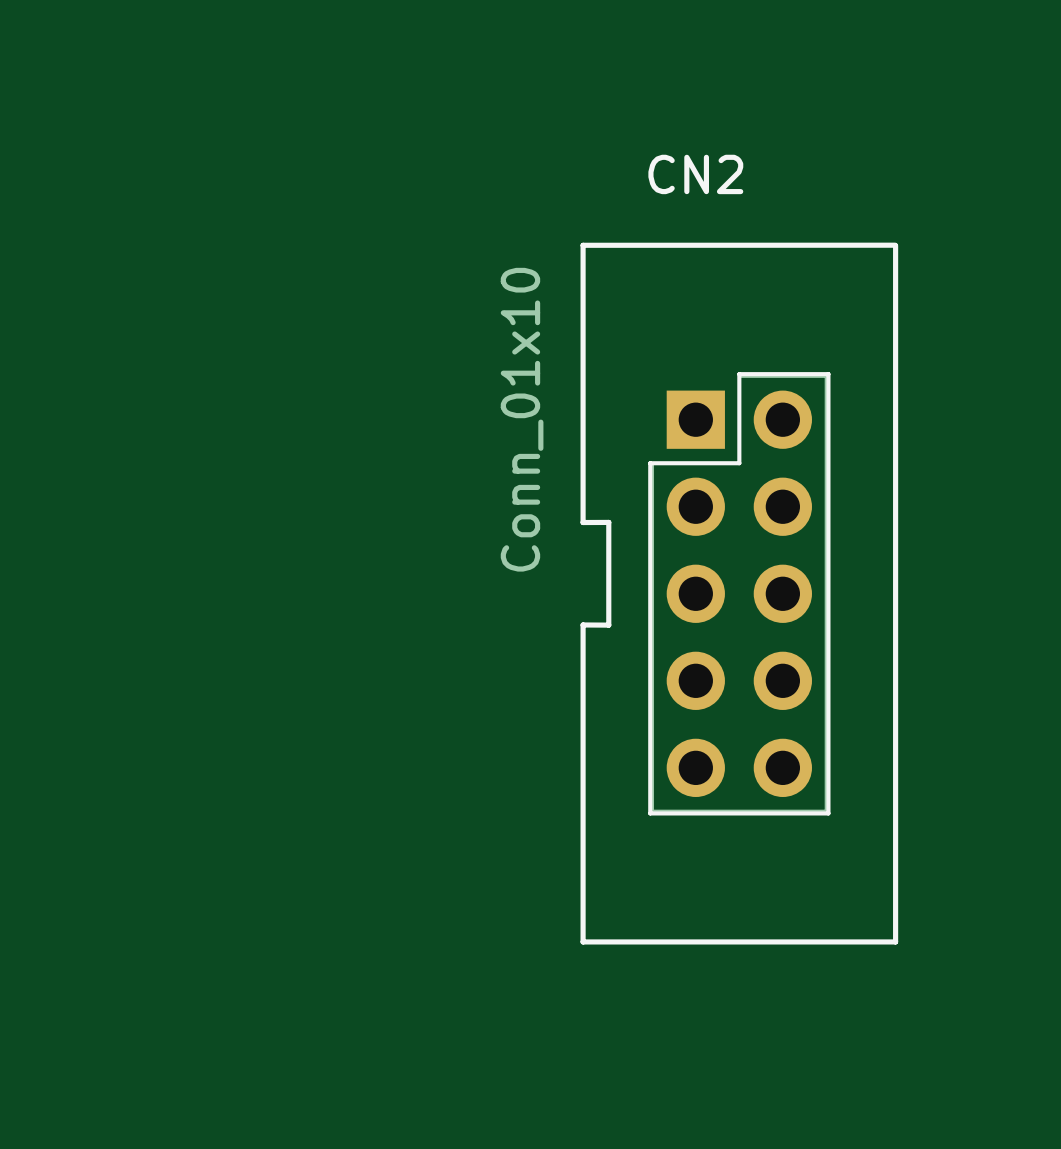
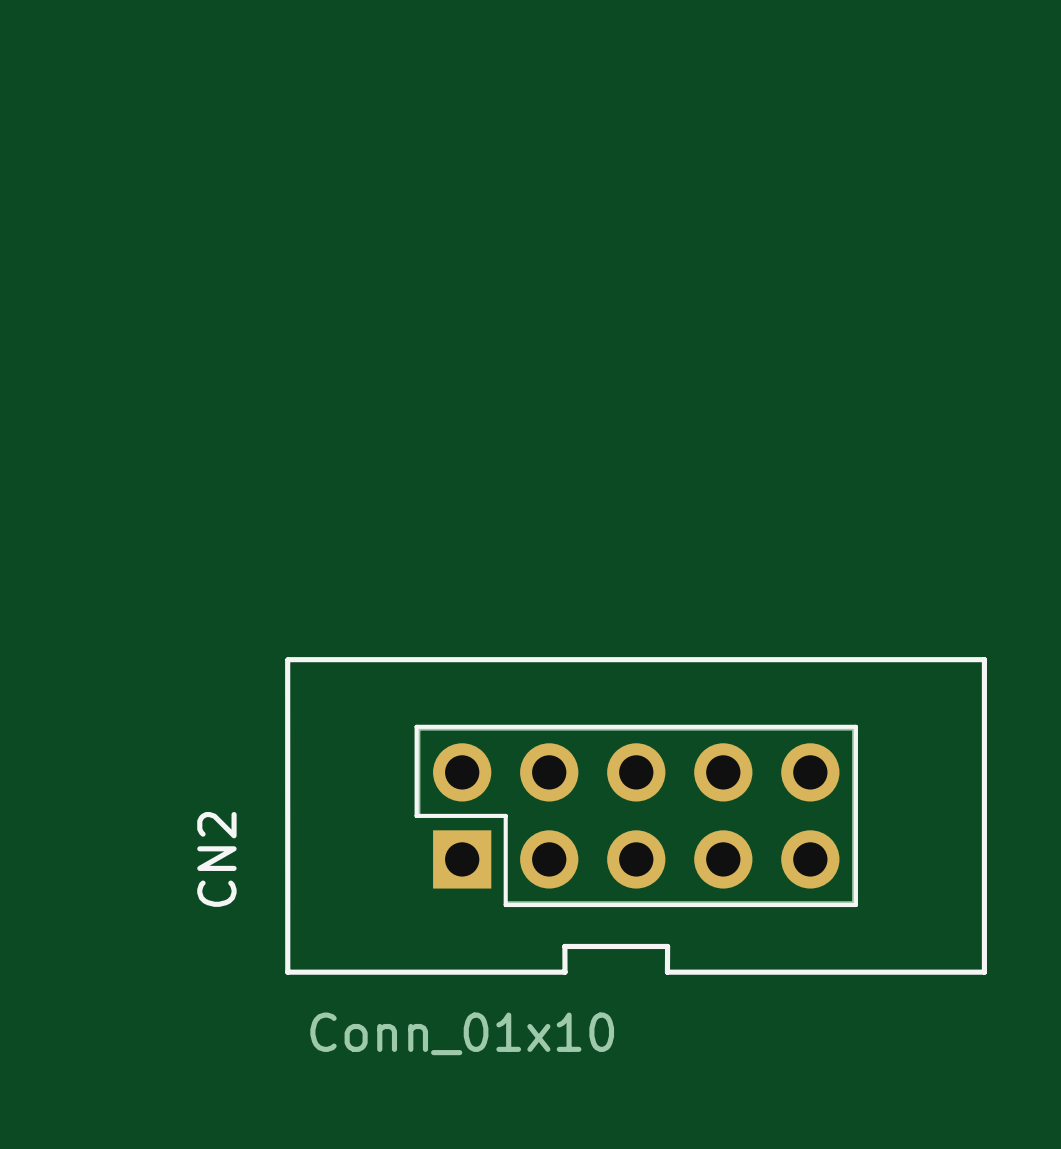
CN2 rotation: 0° (739, 593) -> 90° counterclockwise (636, 815)

